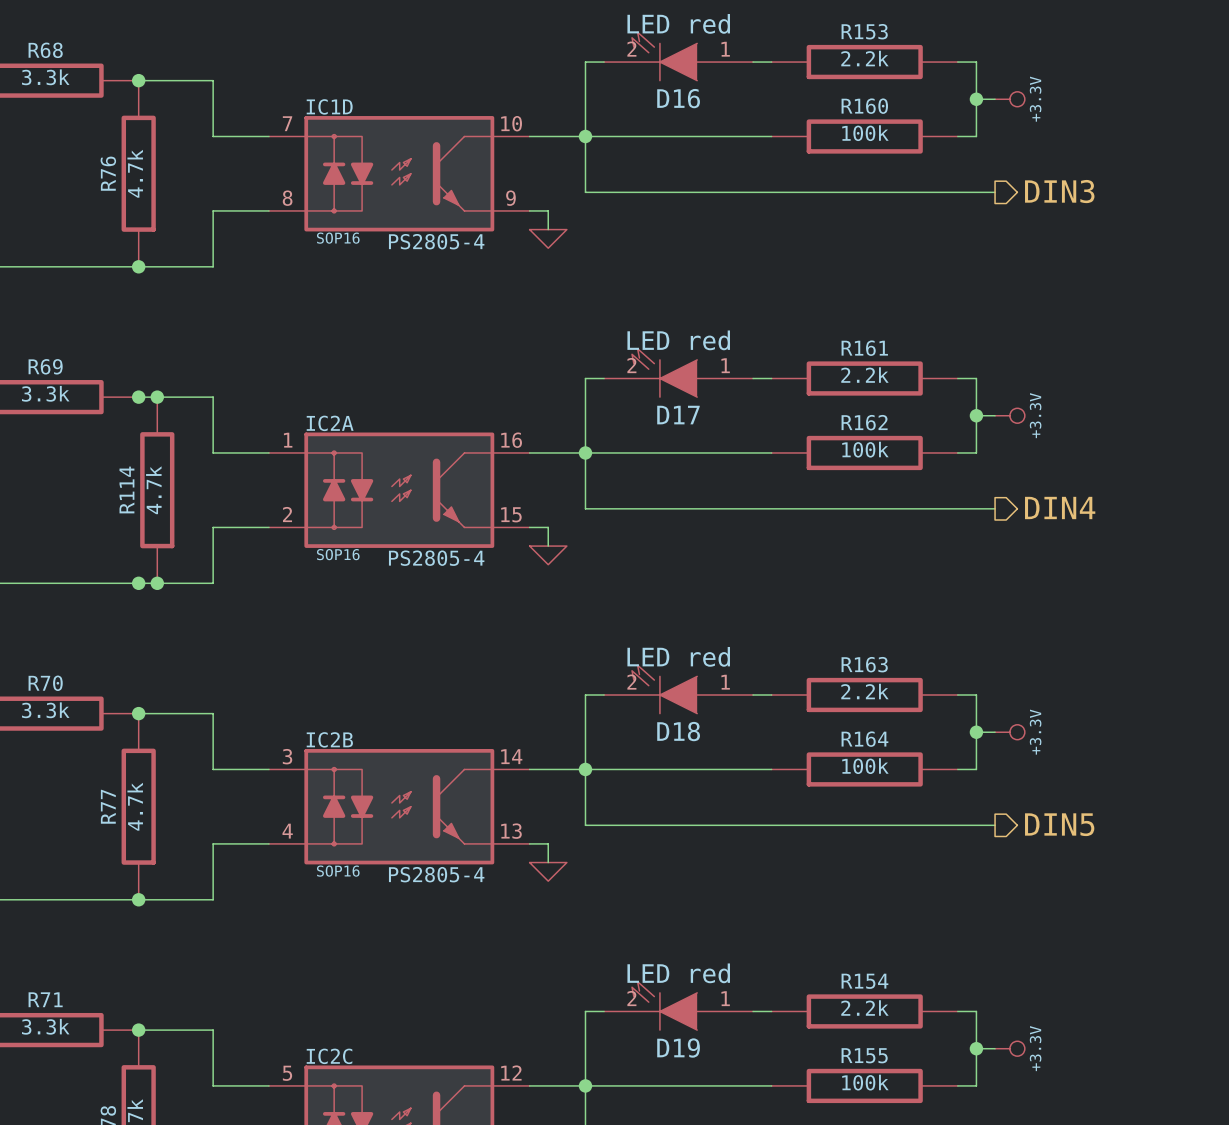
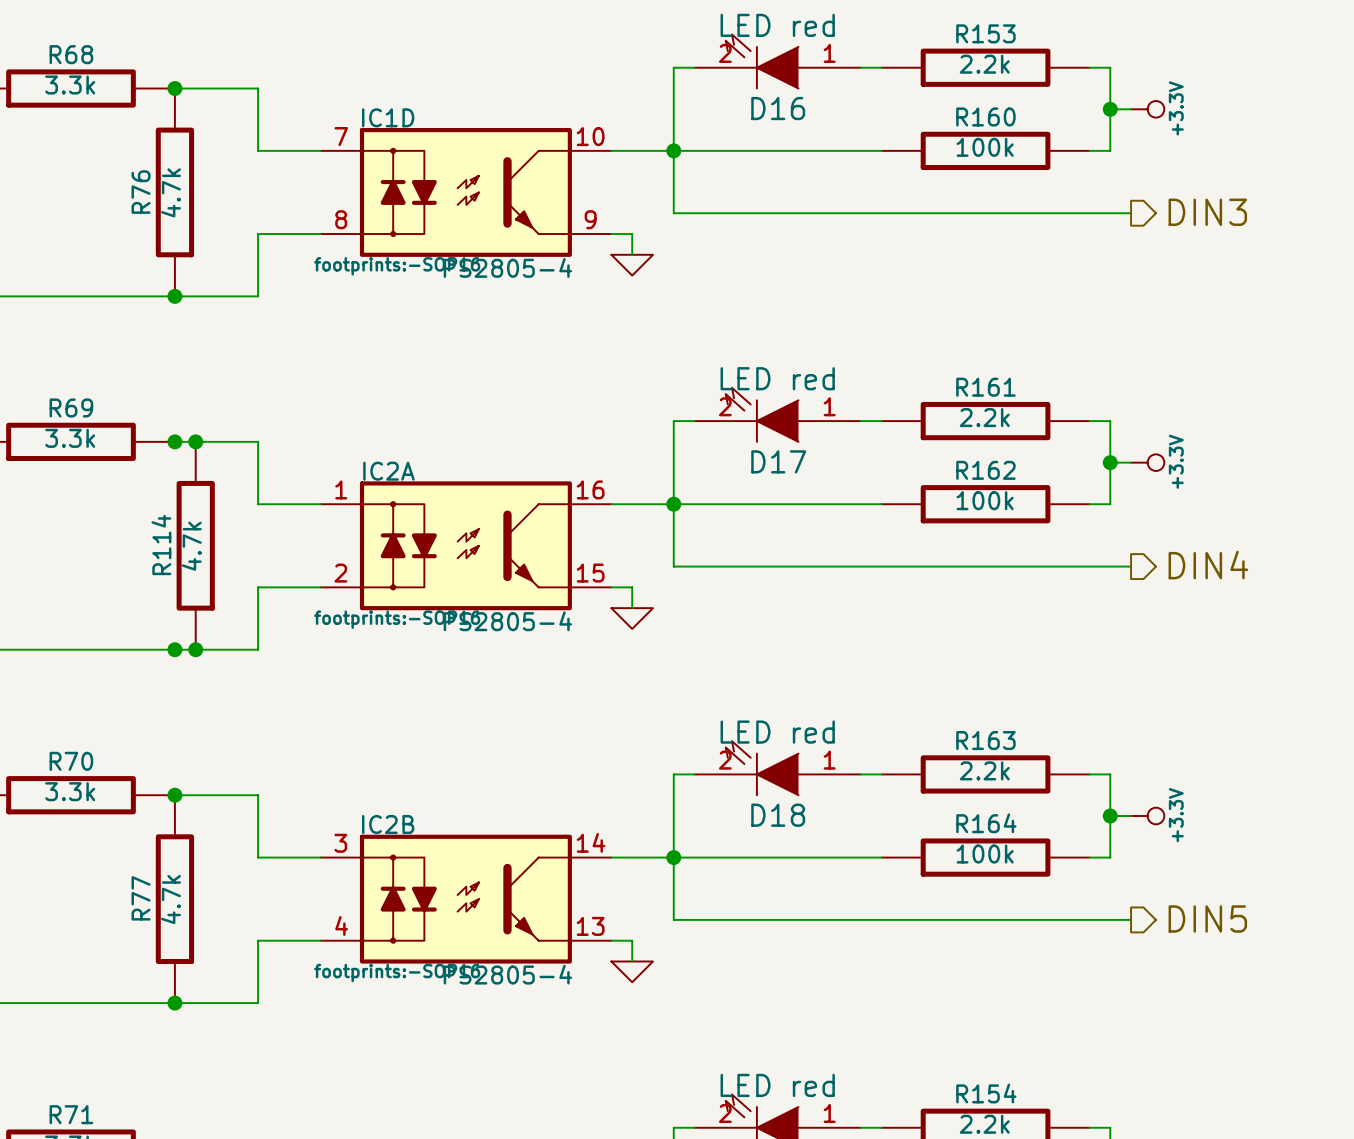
IC1D text: SOP16 (338, 238) -> footprints:-SOP16 (397, 266)
IC2A text: SOP16 (338, 554) -> footprints:-SOP16 (397, 619)
IC2B text: SOP16 (338, 871) -> footprints:-SOP16 (397, 973)

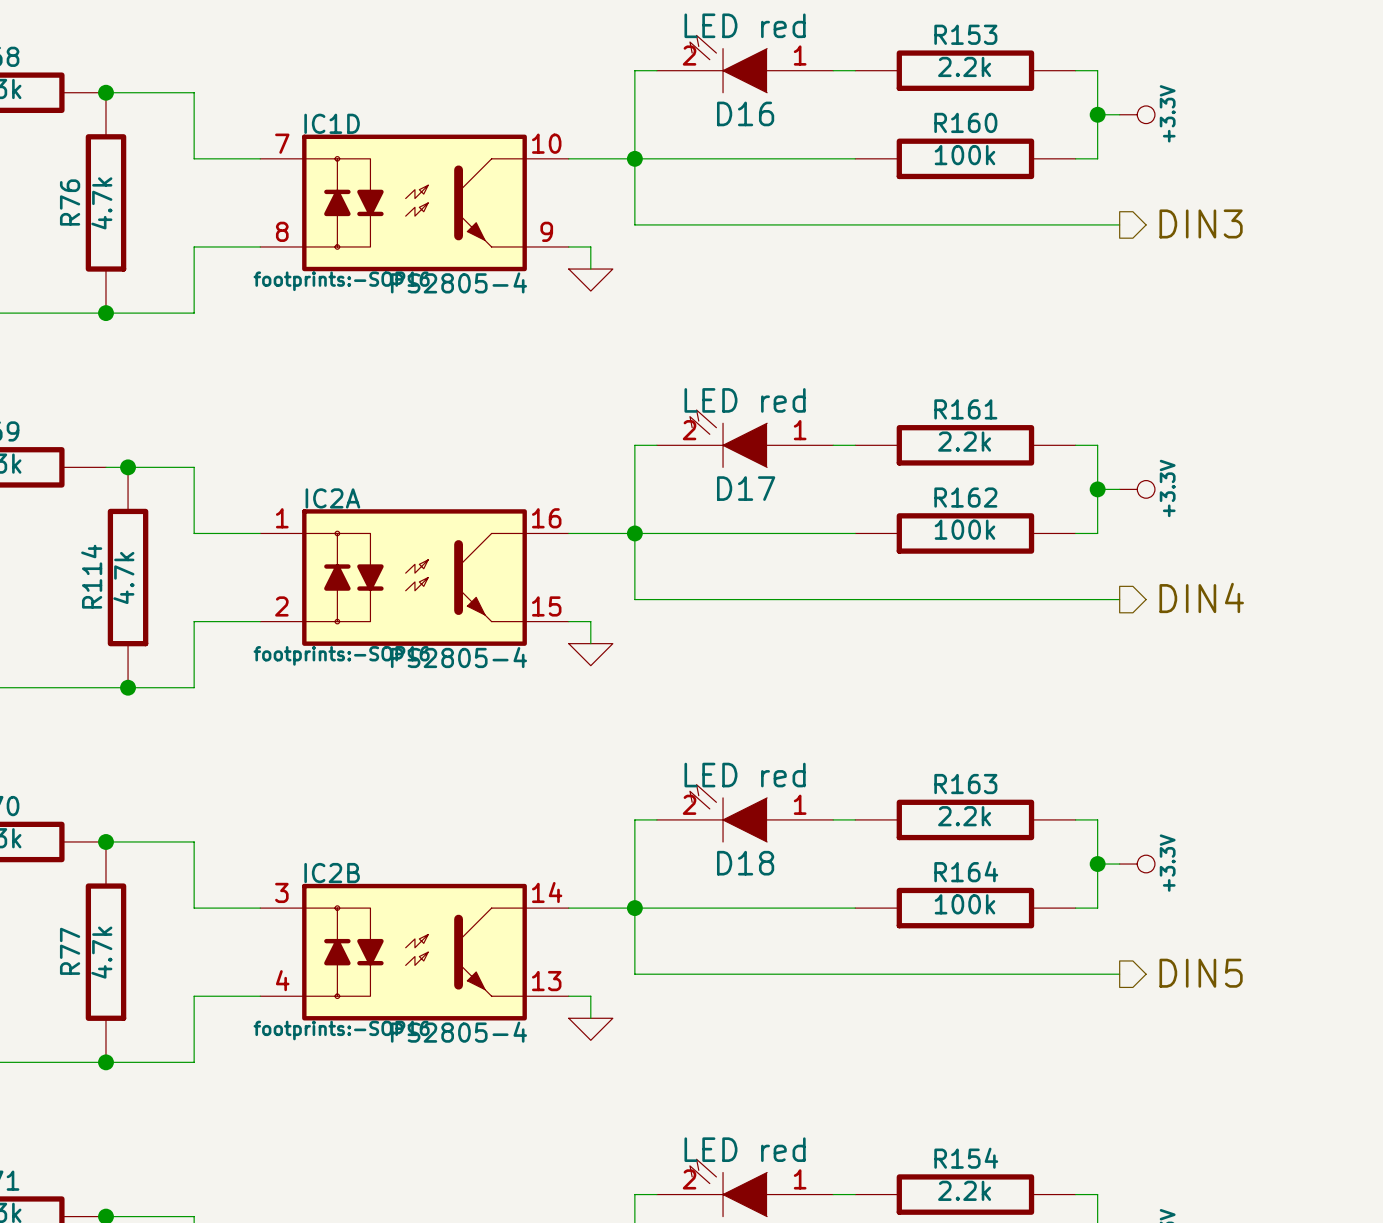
junction: (174, 441) -> none
junction: (174, 649) -> none

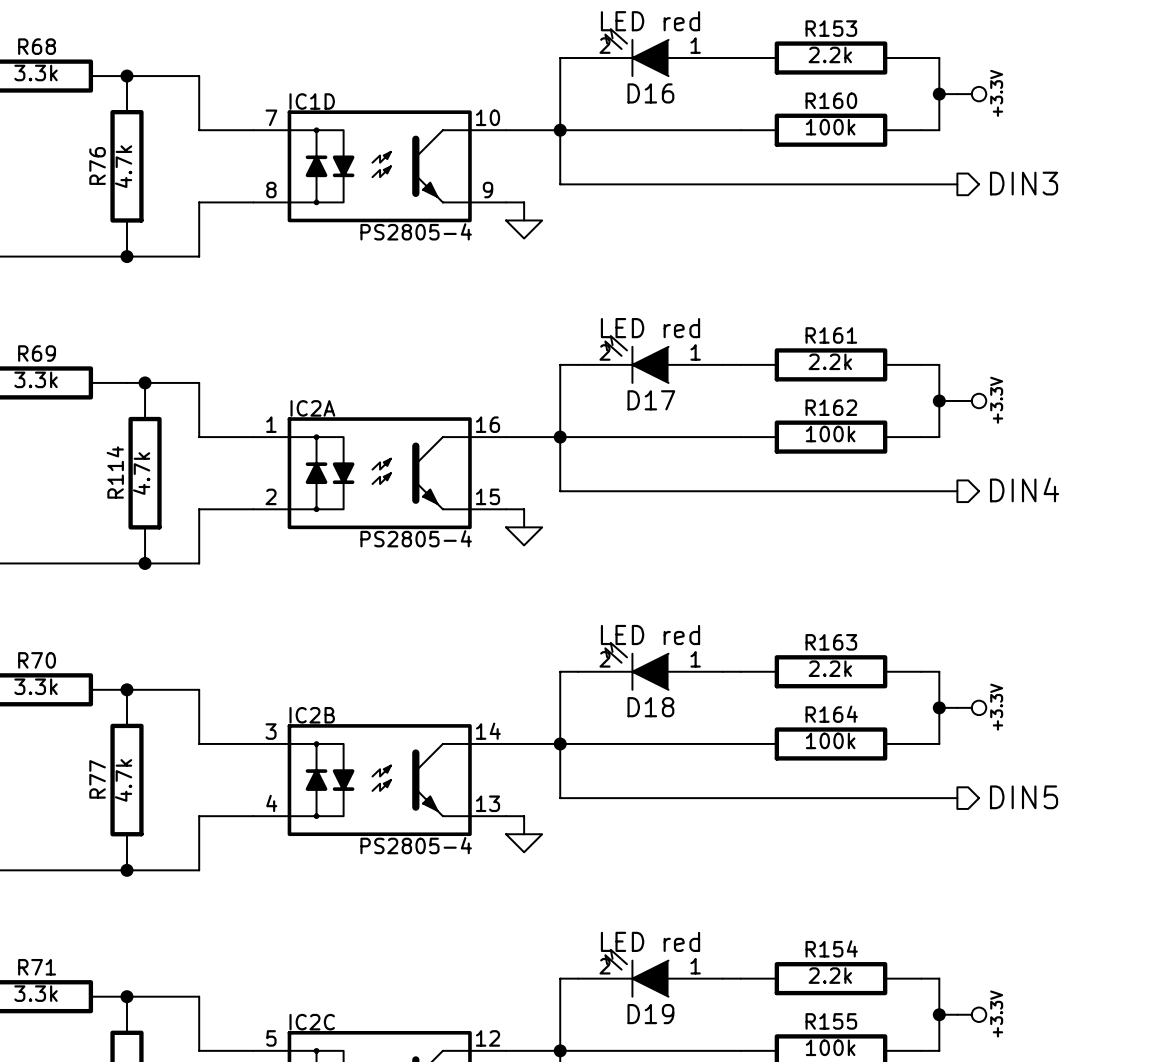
IC1D text: footprints:-SOP16 (341, 281) -> none
IC2A text: footprints:-SOP16 (341, 655) -> none
IC2B text: footprints:-SOP16 (341, 1030) -> none

